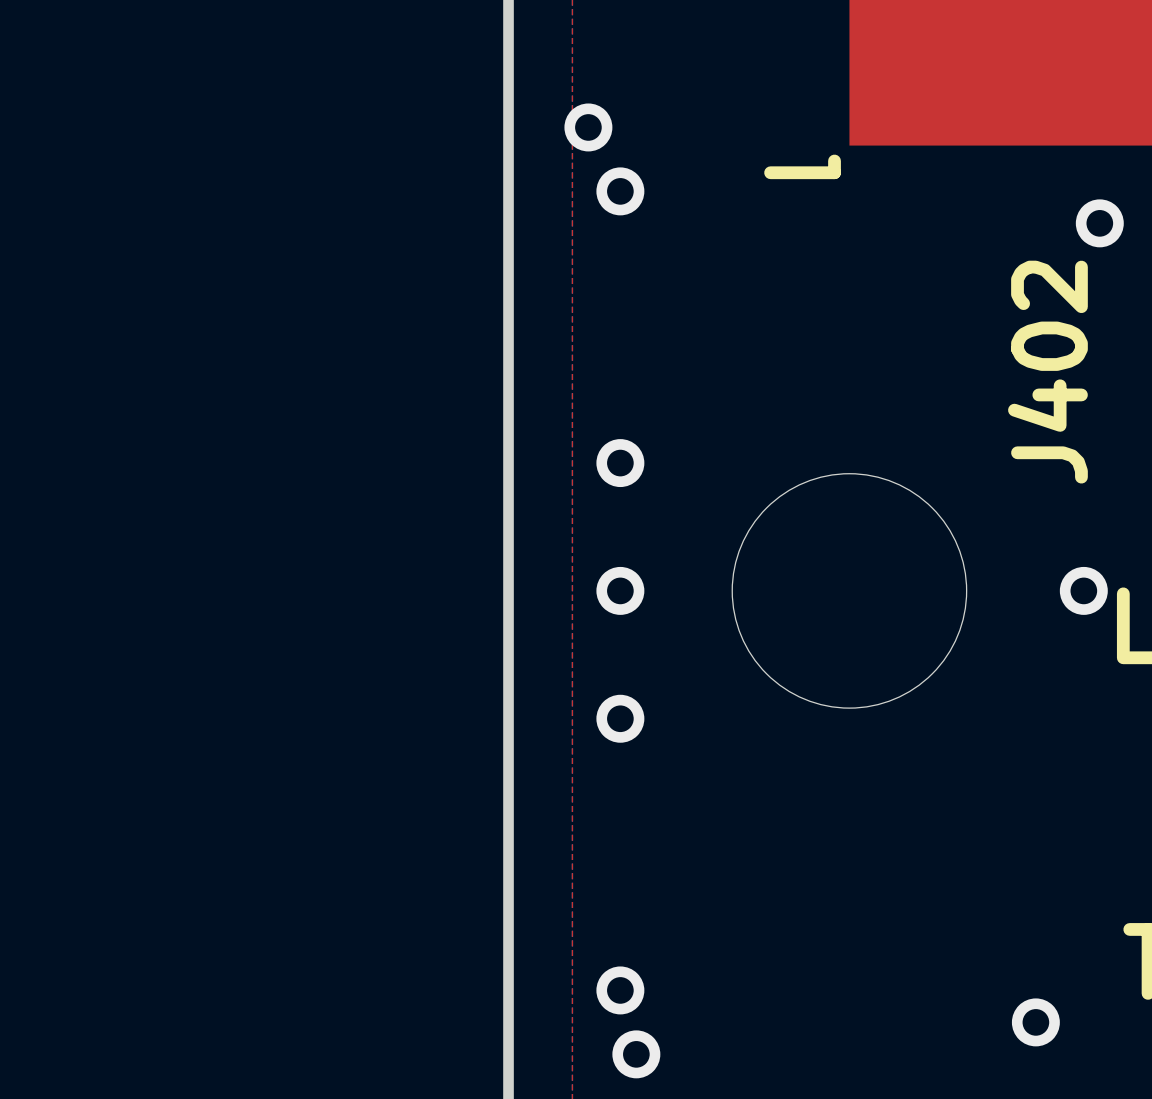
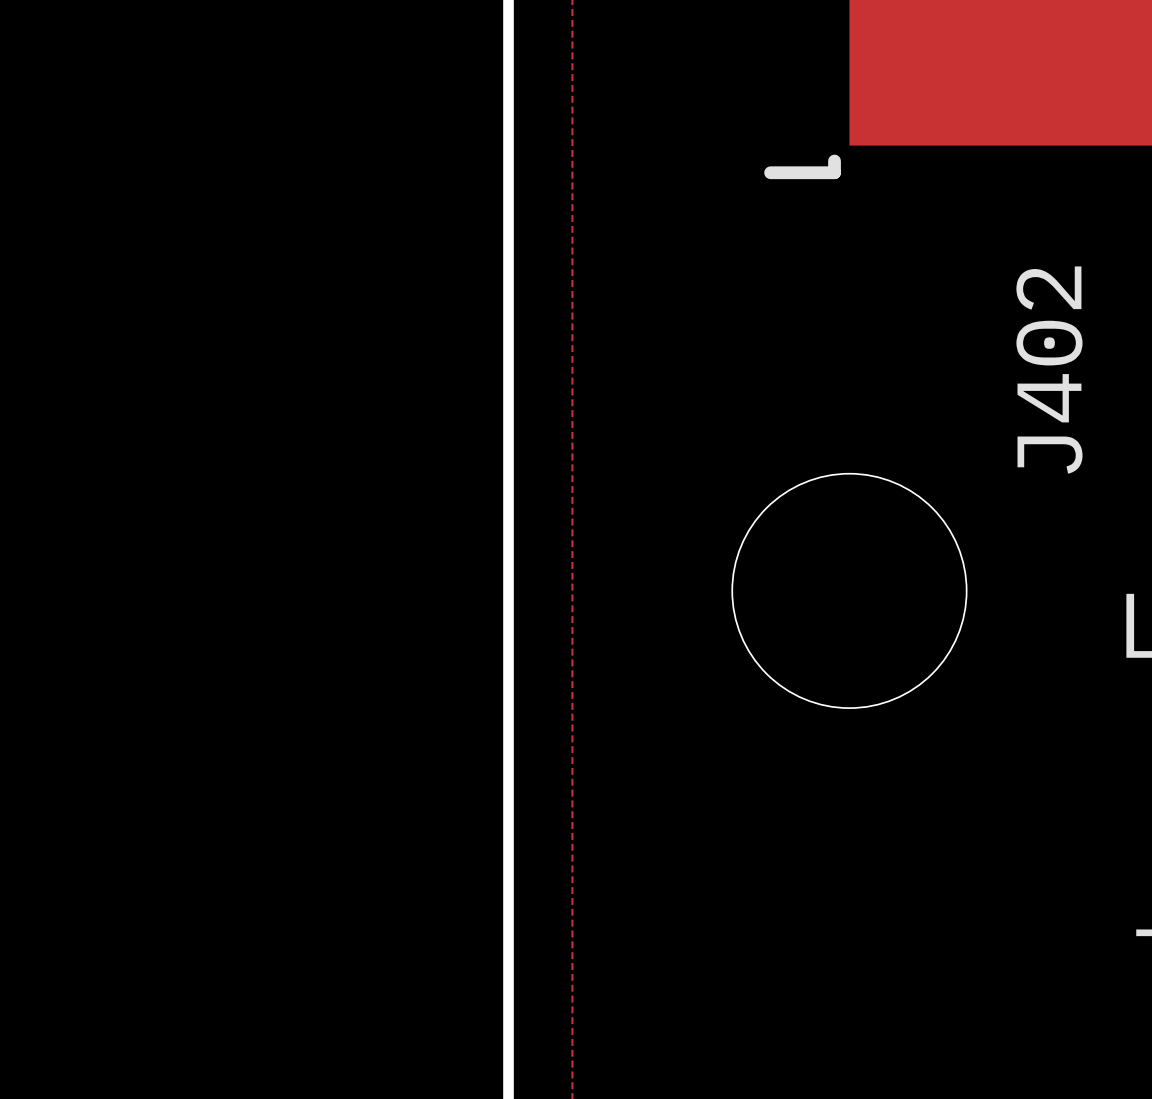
via: (588, 127) -> none
via: (620, 191) -> none
via: (1099, 223) -> none
via: (620, 463) -> none
via: (620, 590) -> none
via: (1083, 590) -> none
via: (620, 718) -> none
via: (620, 990) -> none
via: (1035, 1022) -> none
via: (636, 1054) -> none

